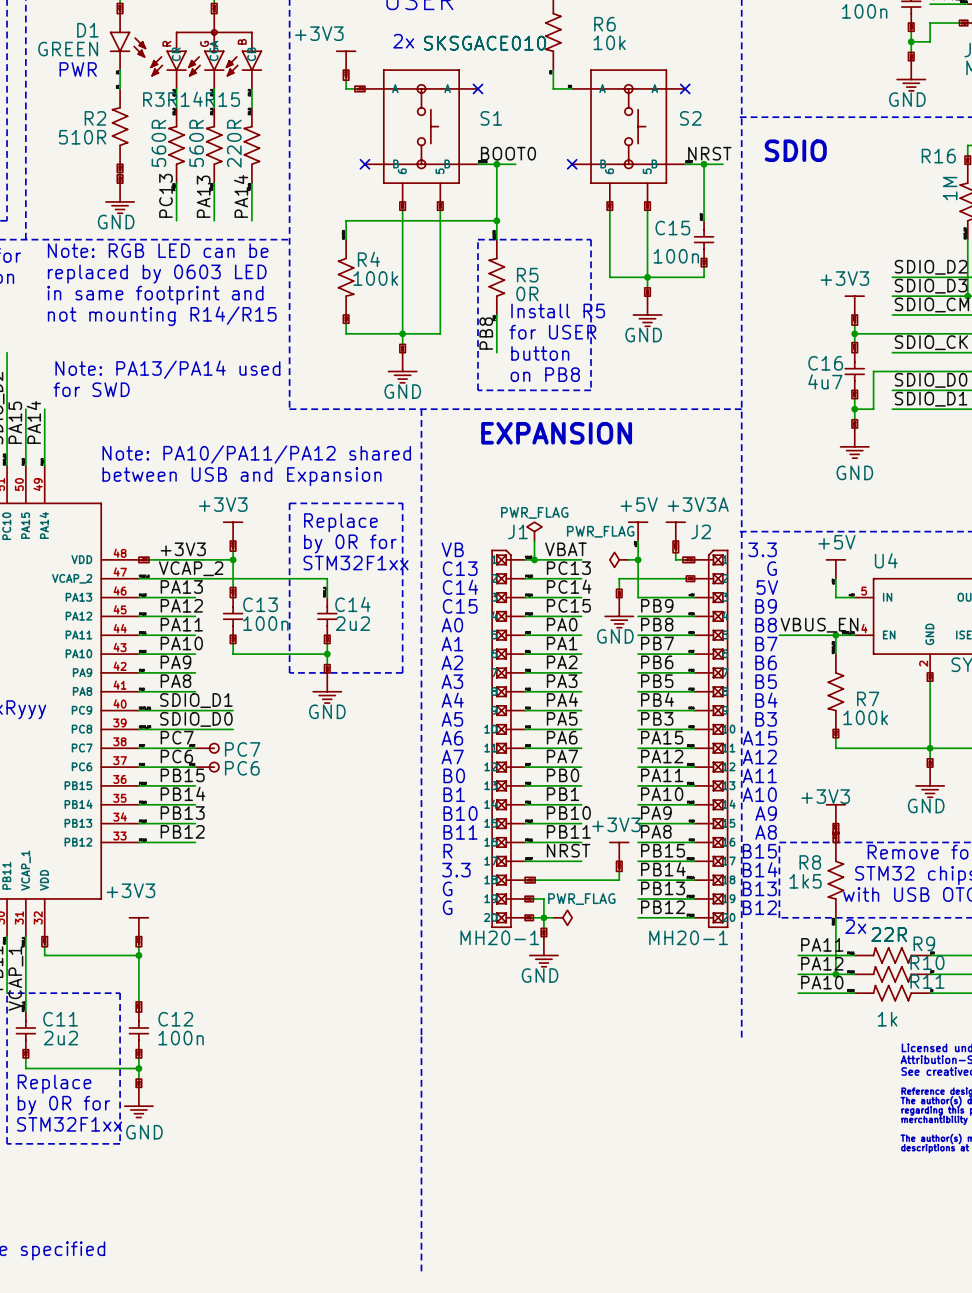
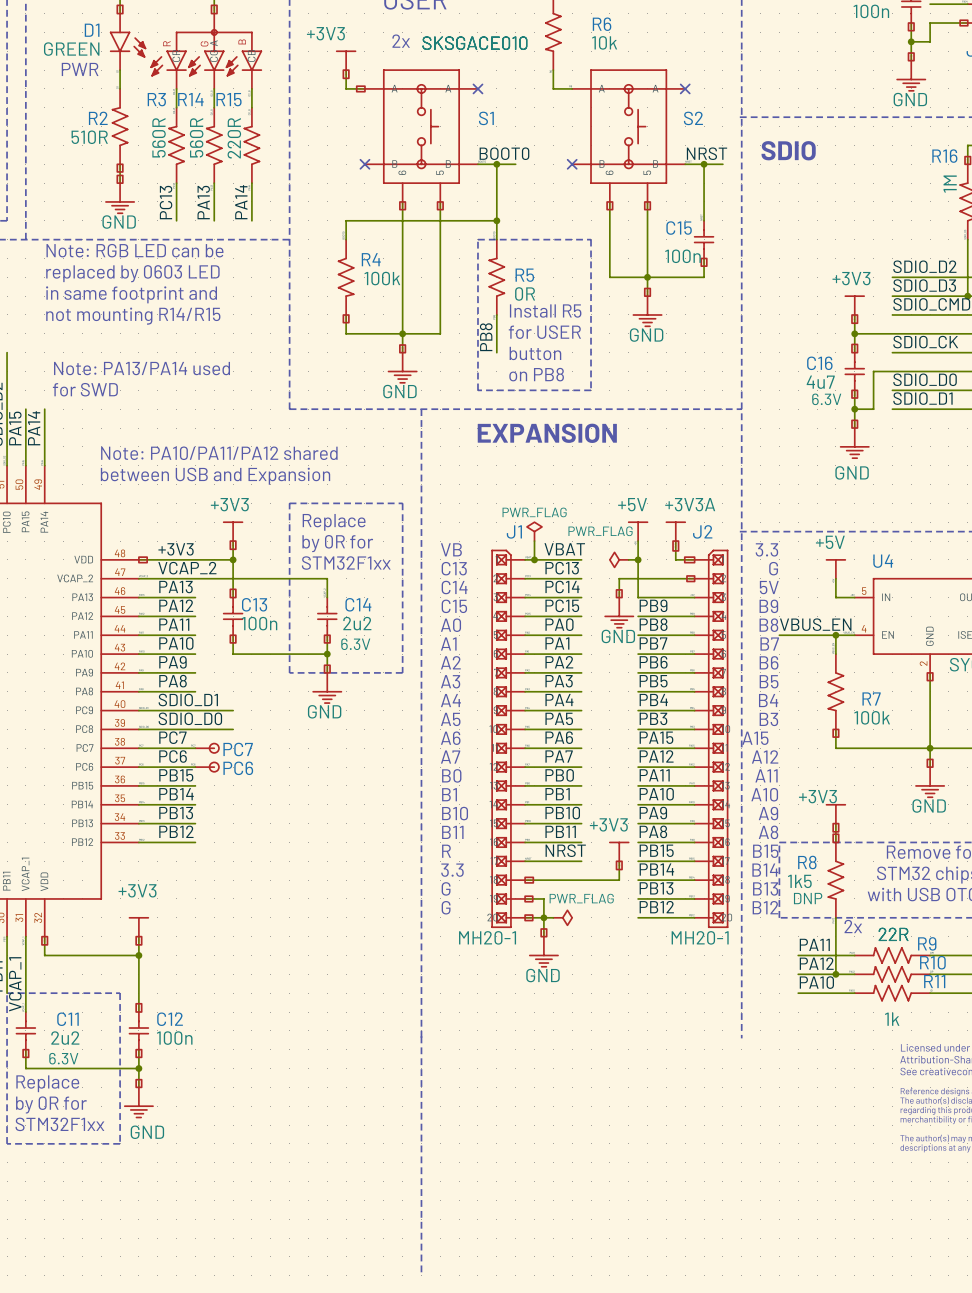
C16 text: none -> 6.3V (826, 399)
C14 text: none -> 6.3V (355, 644)
R8 text: none -> DNP (808, 898)
C11 text: none -> 6.3V (63, 1058)

